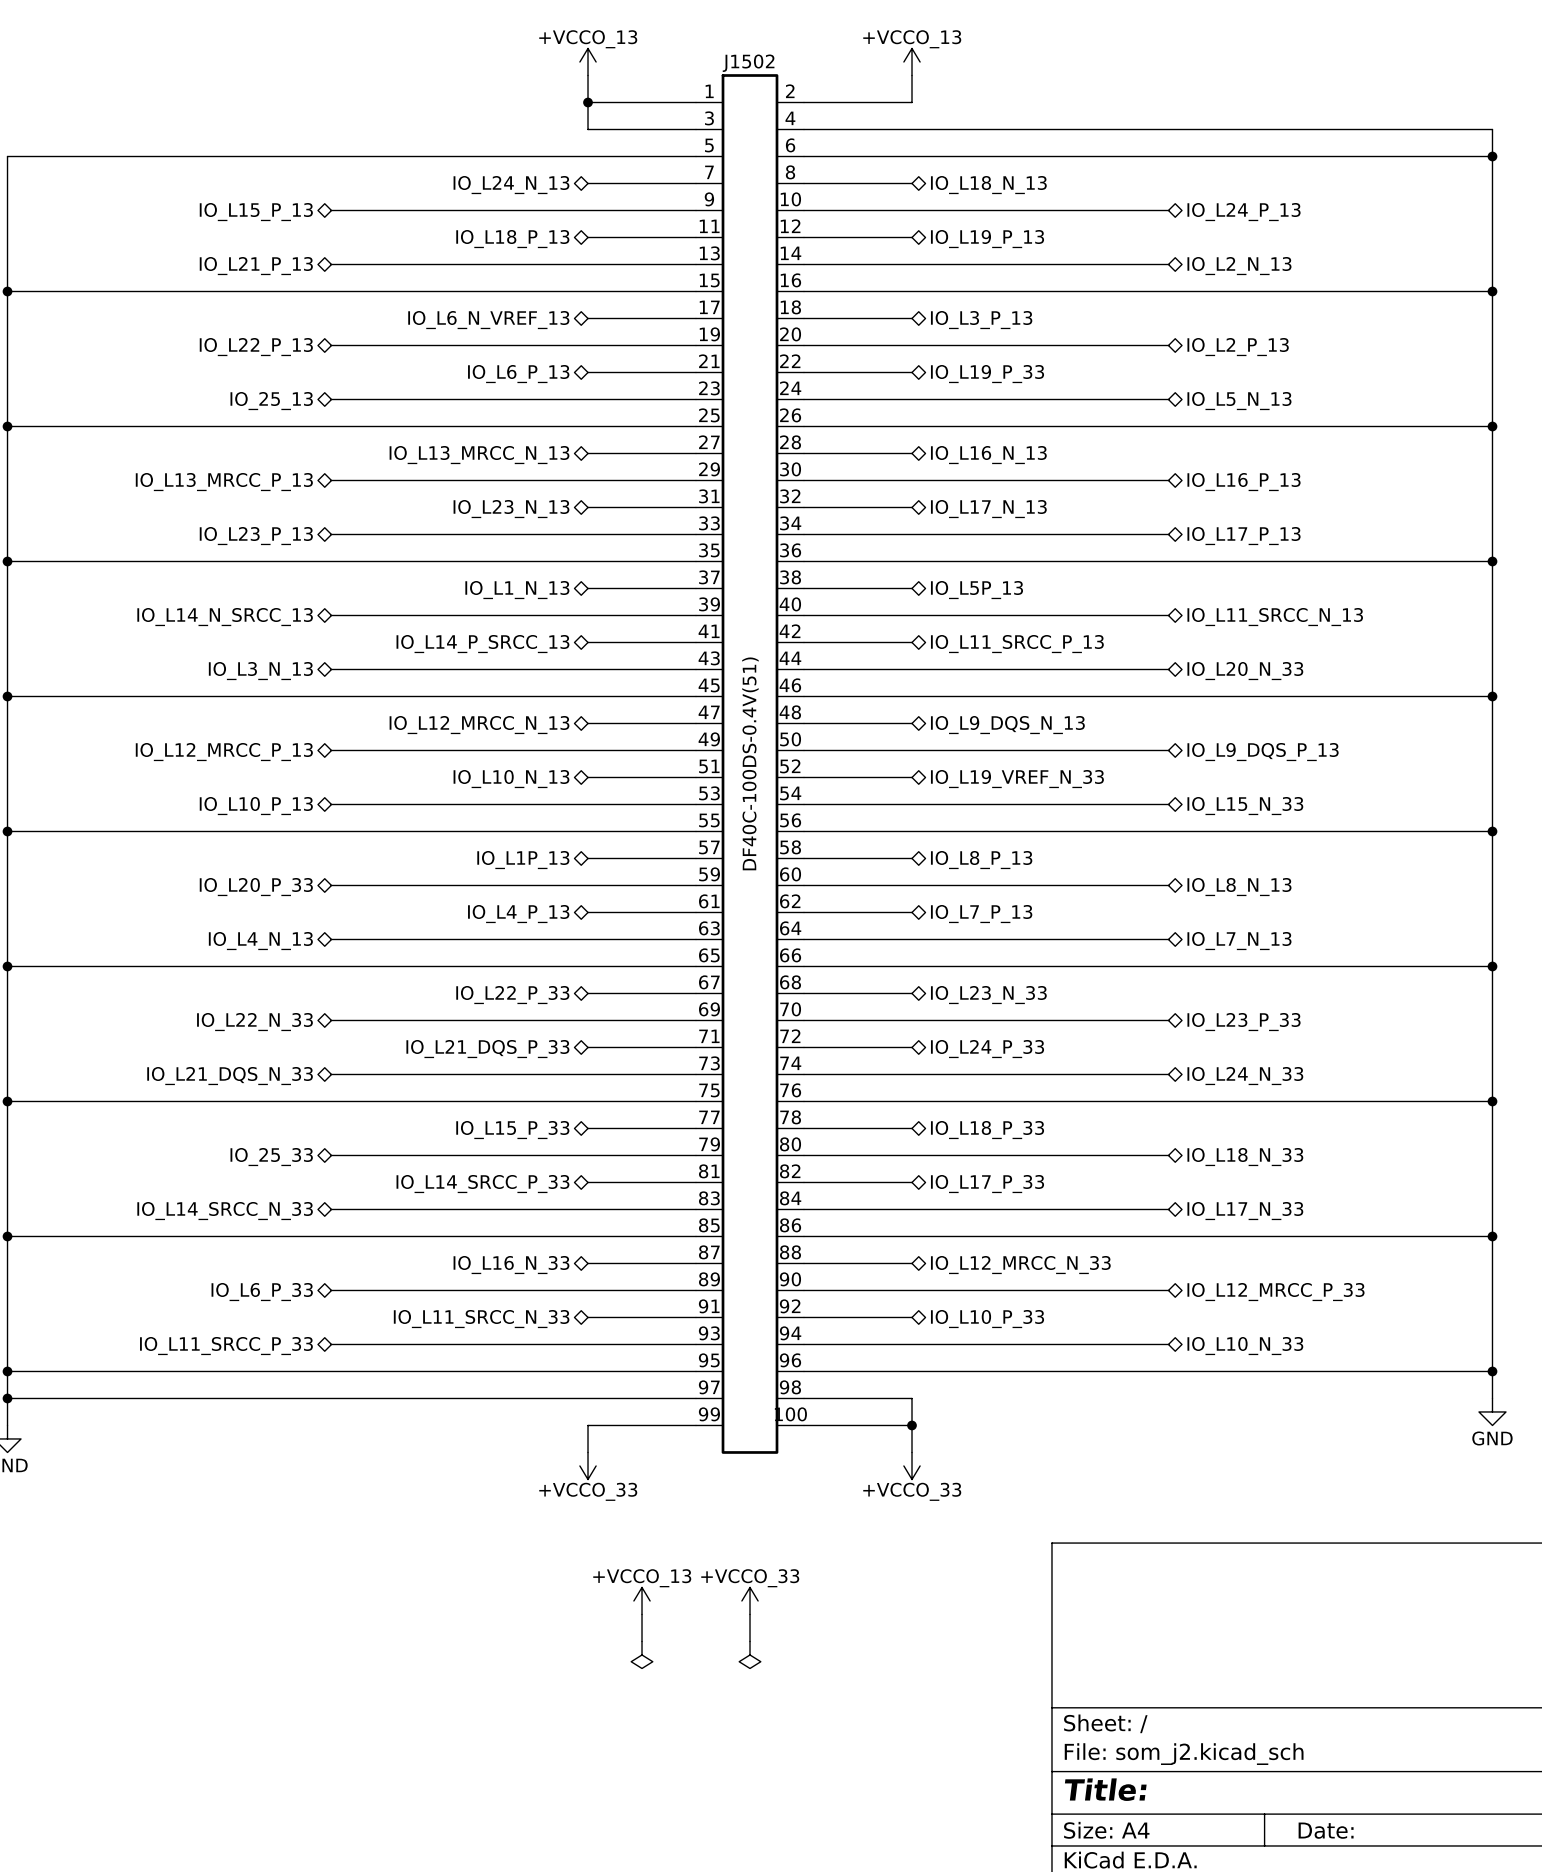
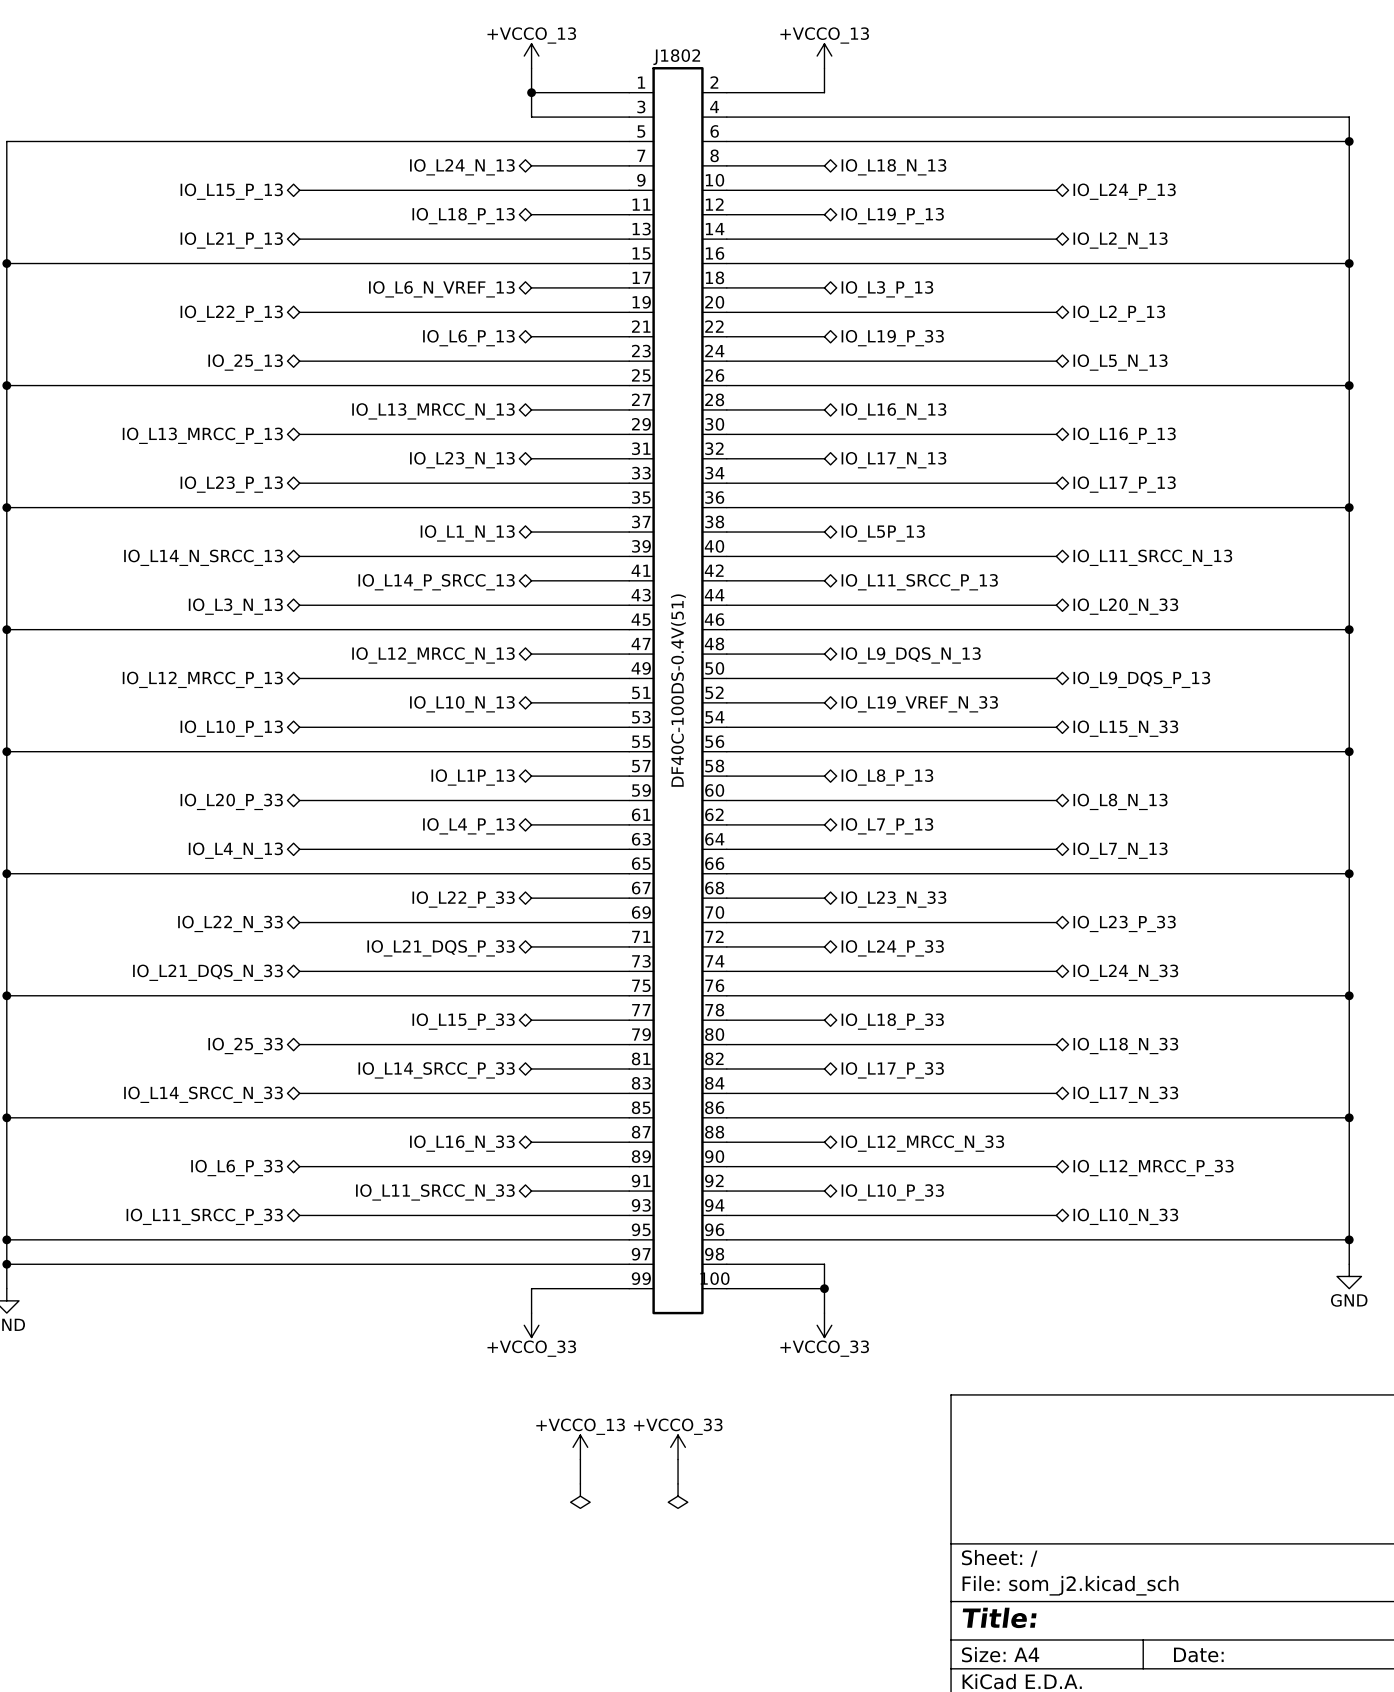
J1502 name: J1502 (748, 63) -> J1802 (676, 57)

